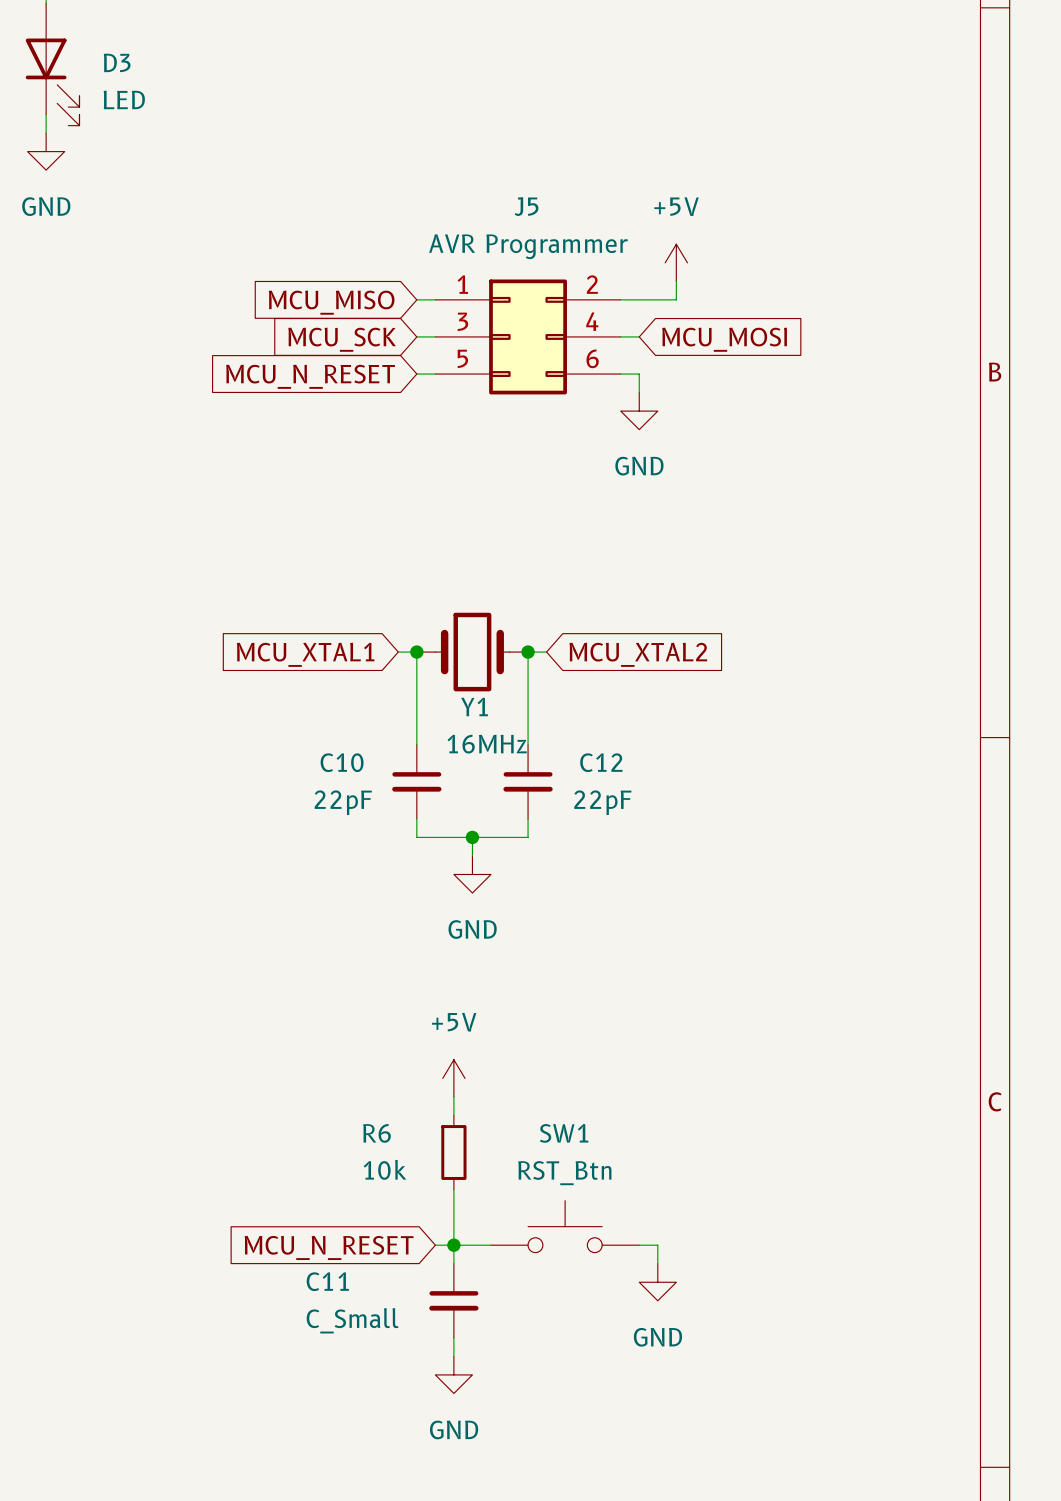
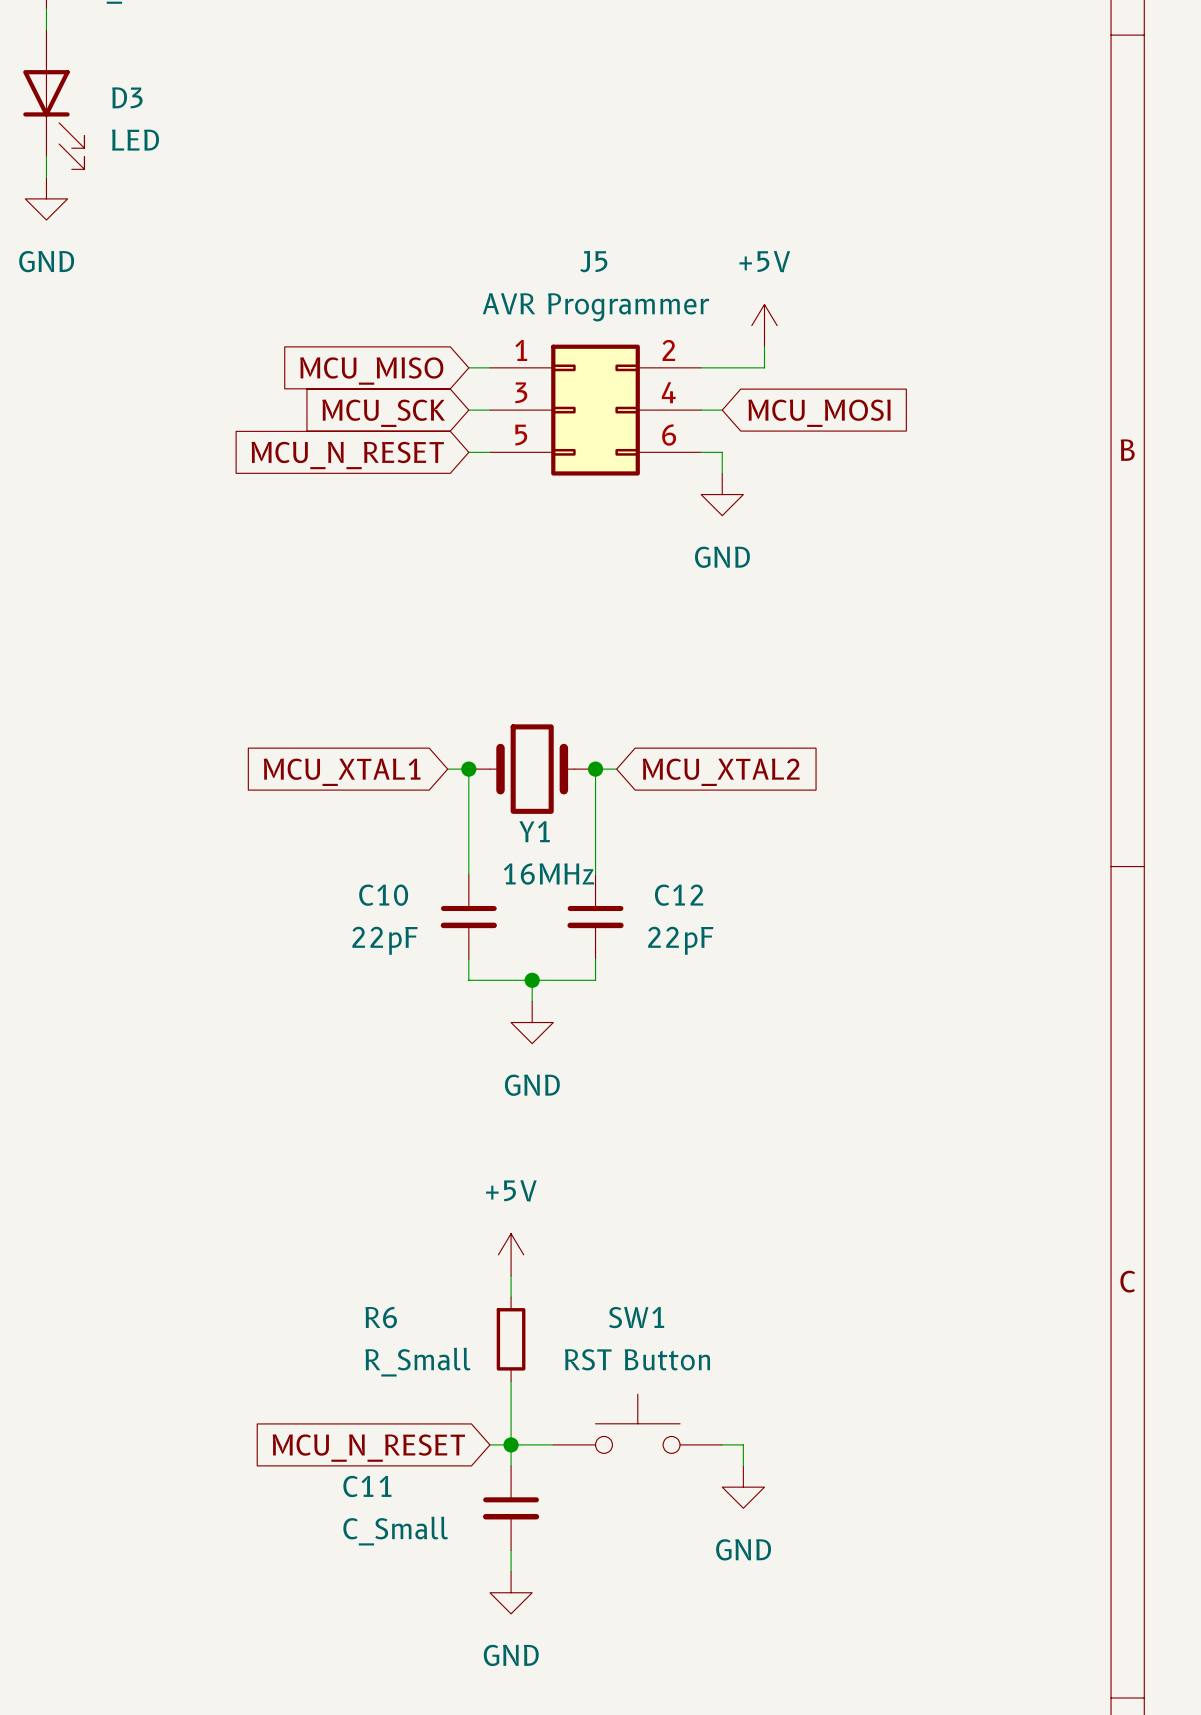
R6 name position: R6 (376, 1133) -> R6 (381, 1317)
R6 value: 10k (384, 1169) -> R_Small (417, 1362)
SW1 value: RST_Btn (564, 1173) -> RST Button (637, 1359)

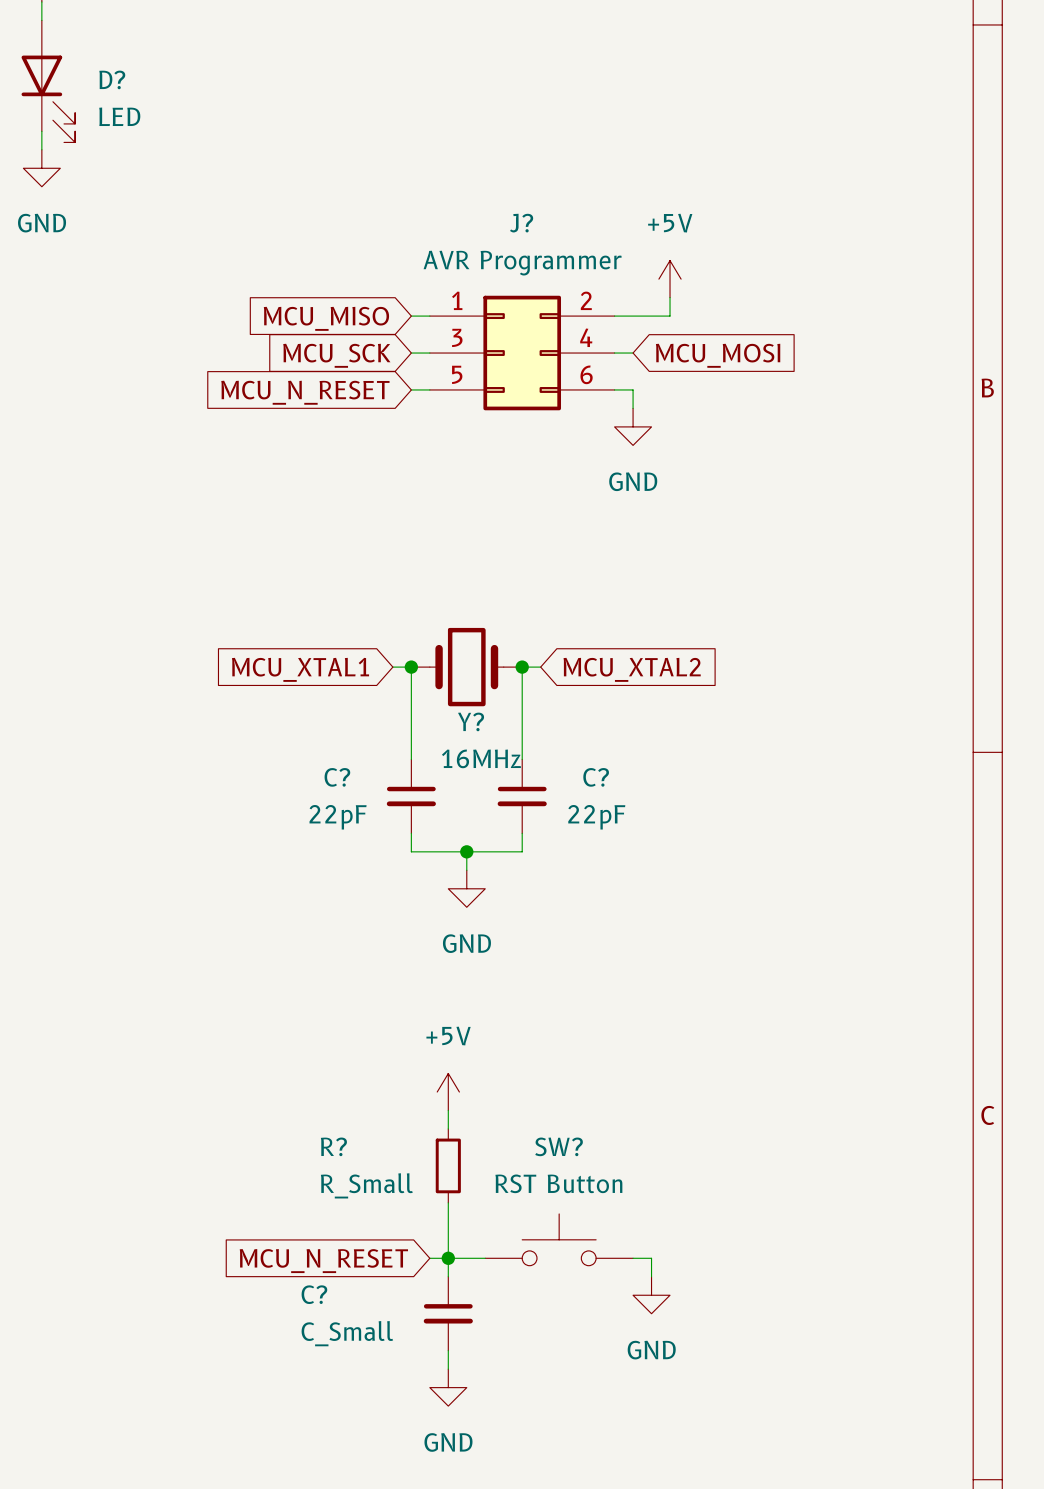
D3 name: D3 (127, 97) -> D? (112, 79)
J5 name: J5 (593, 261) -> J? (521, 223)
Y1 name: Y1 (534, 831) -> Y? (471, 721)
C10 name: C10 (383, 895) -> C? (337, 777)
C12 name: C12 (679, 895) -> C? (596, 777)
R6 name: R6 (381, 1317) -> R? (333, 1146)
SW1 name: SW1 (636, 1317) -> SW? (559, 1146)
C11 name: C11 (367, 1486) -> C? (314, 1294)

